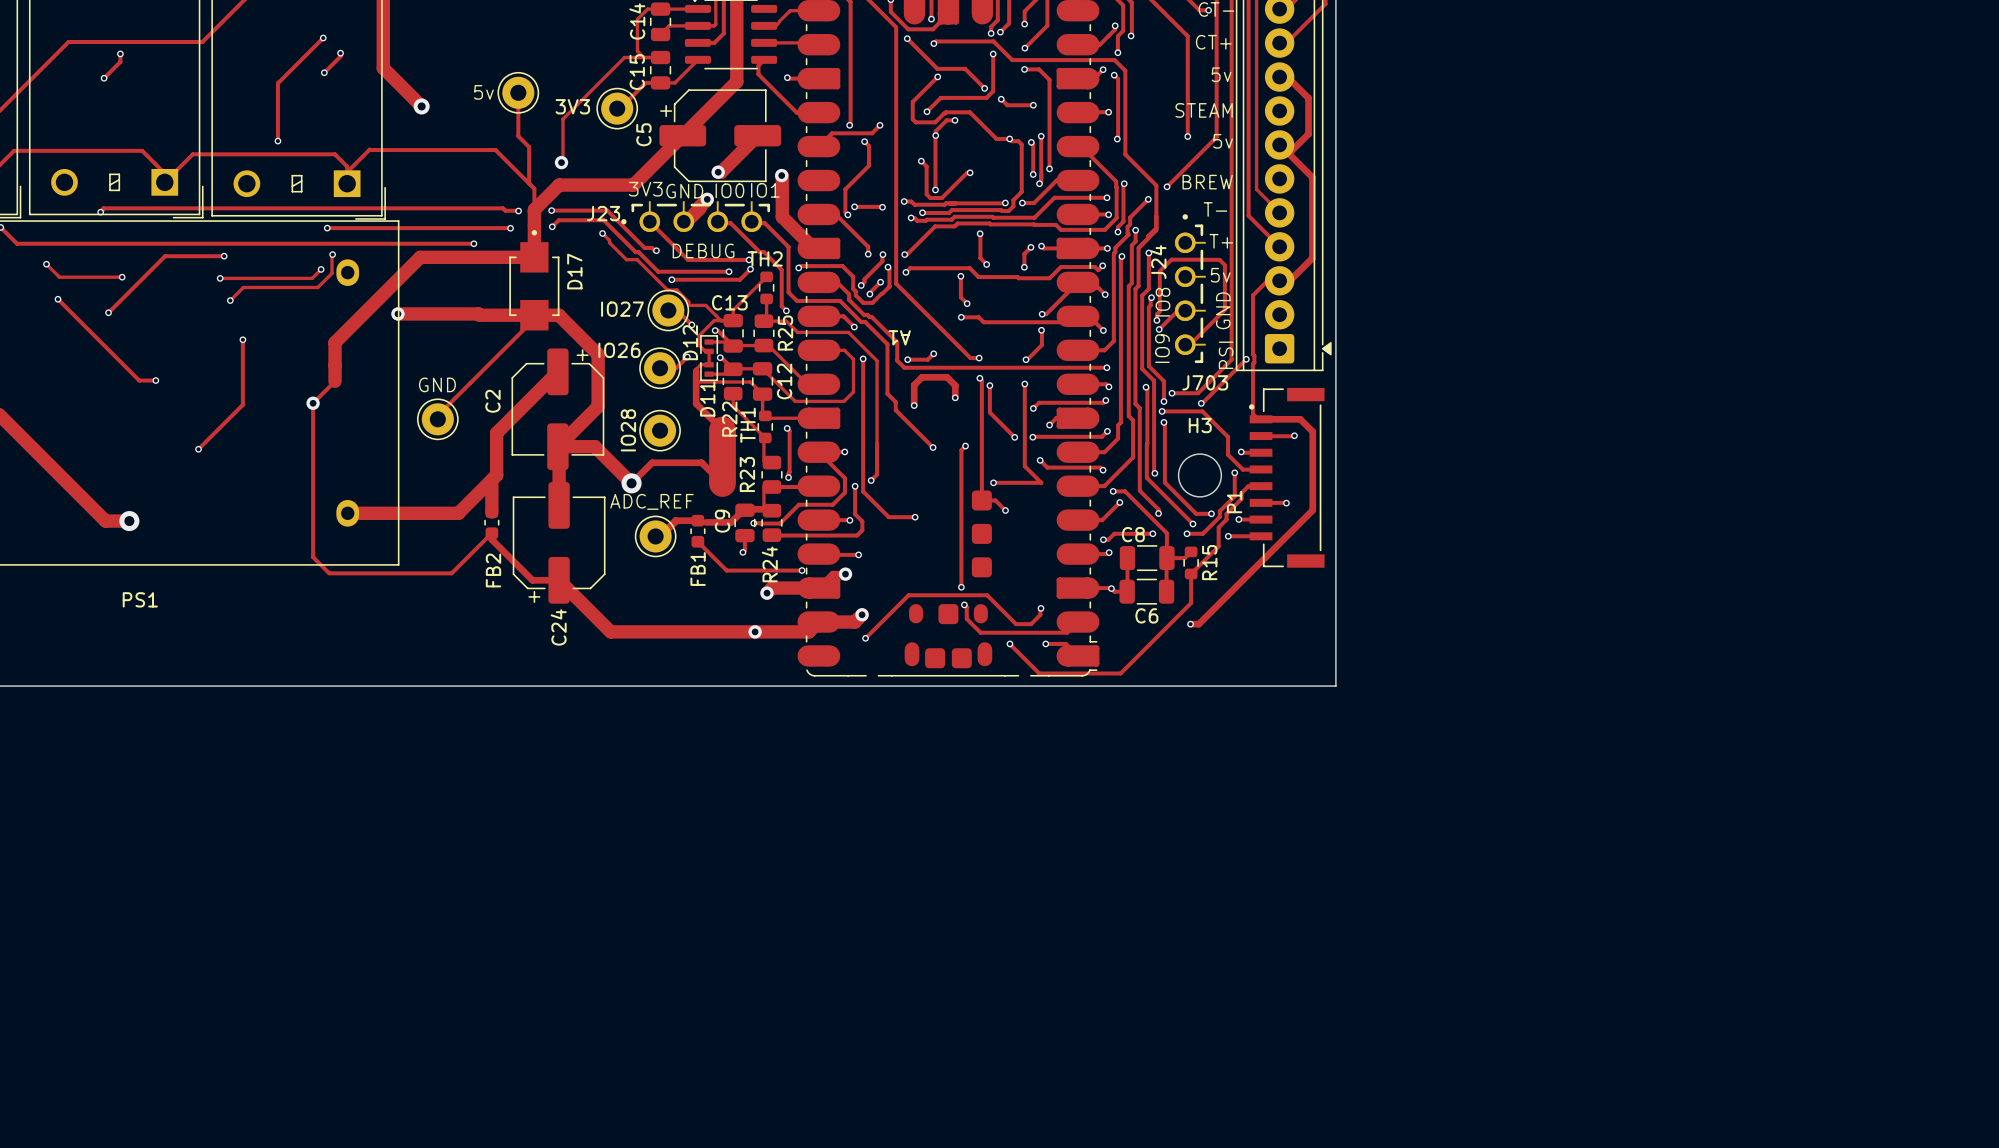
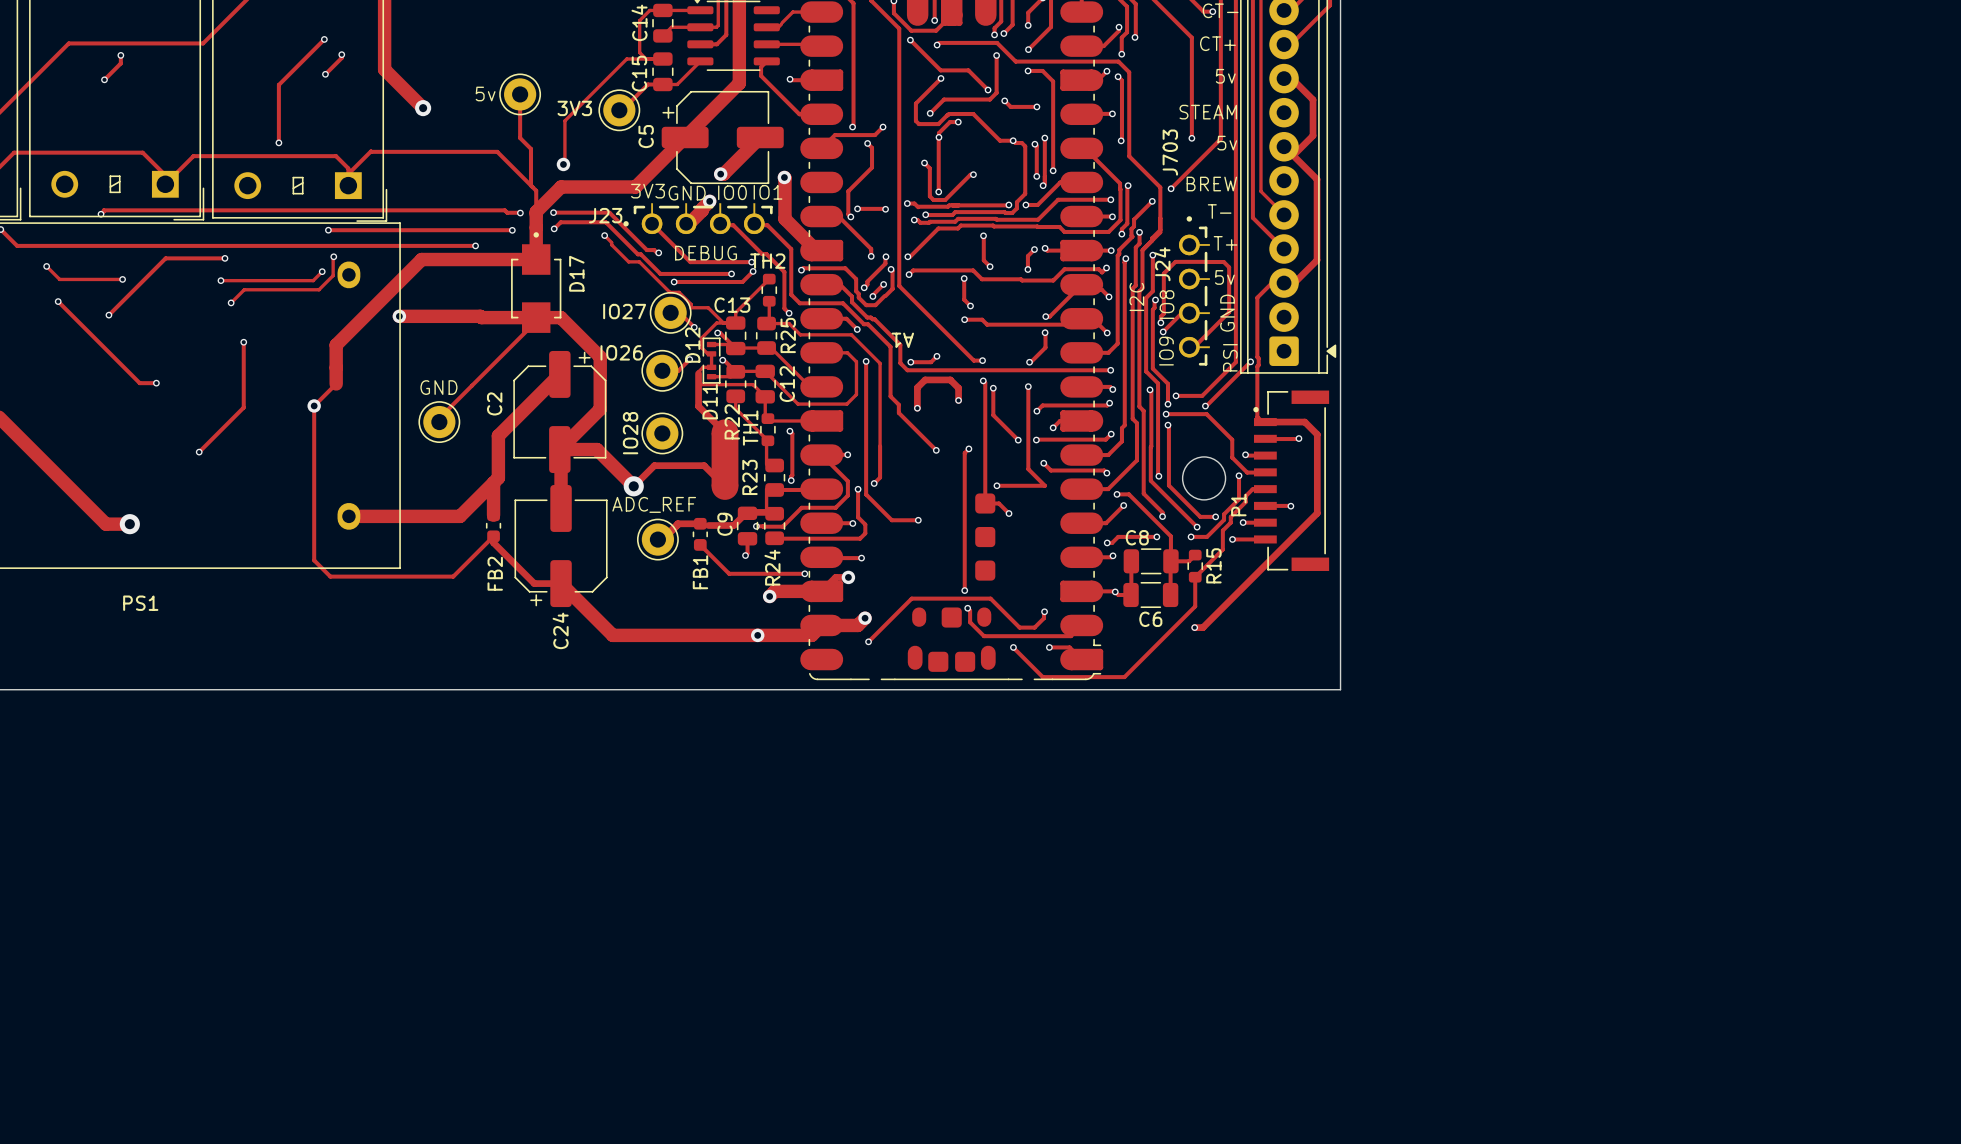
text: none -> I2C (1136, 296)
J703 name rotation: 0° (1205, 382) -> 90° counterclockwise (1170, 152)
J703 name position: J703 (1205, 382) -> J703 (1170, 152)
H3 name: H3 (1200, 425) -> none

